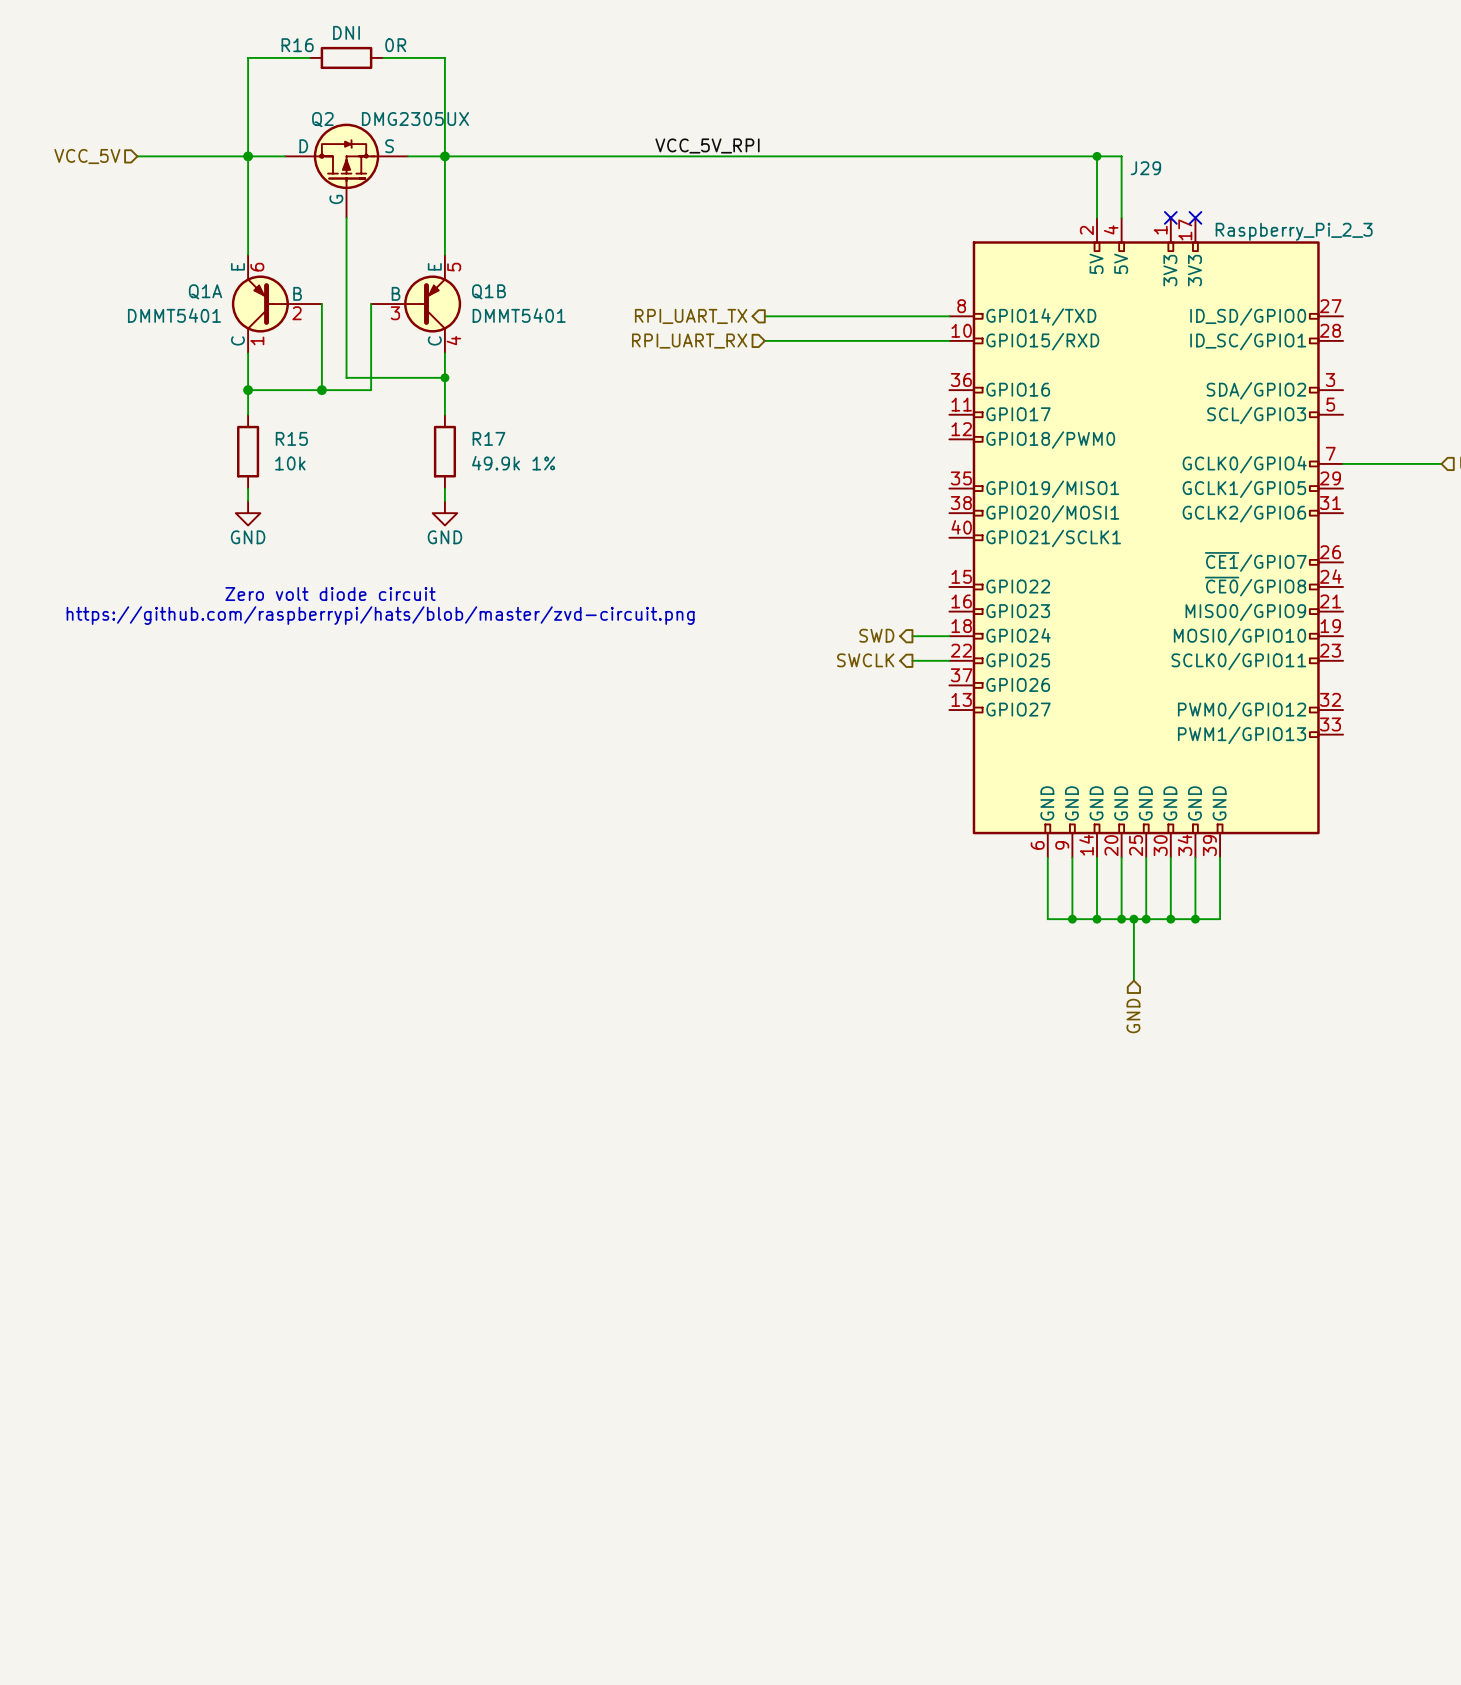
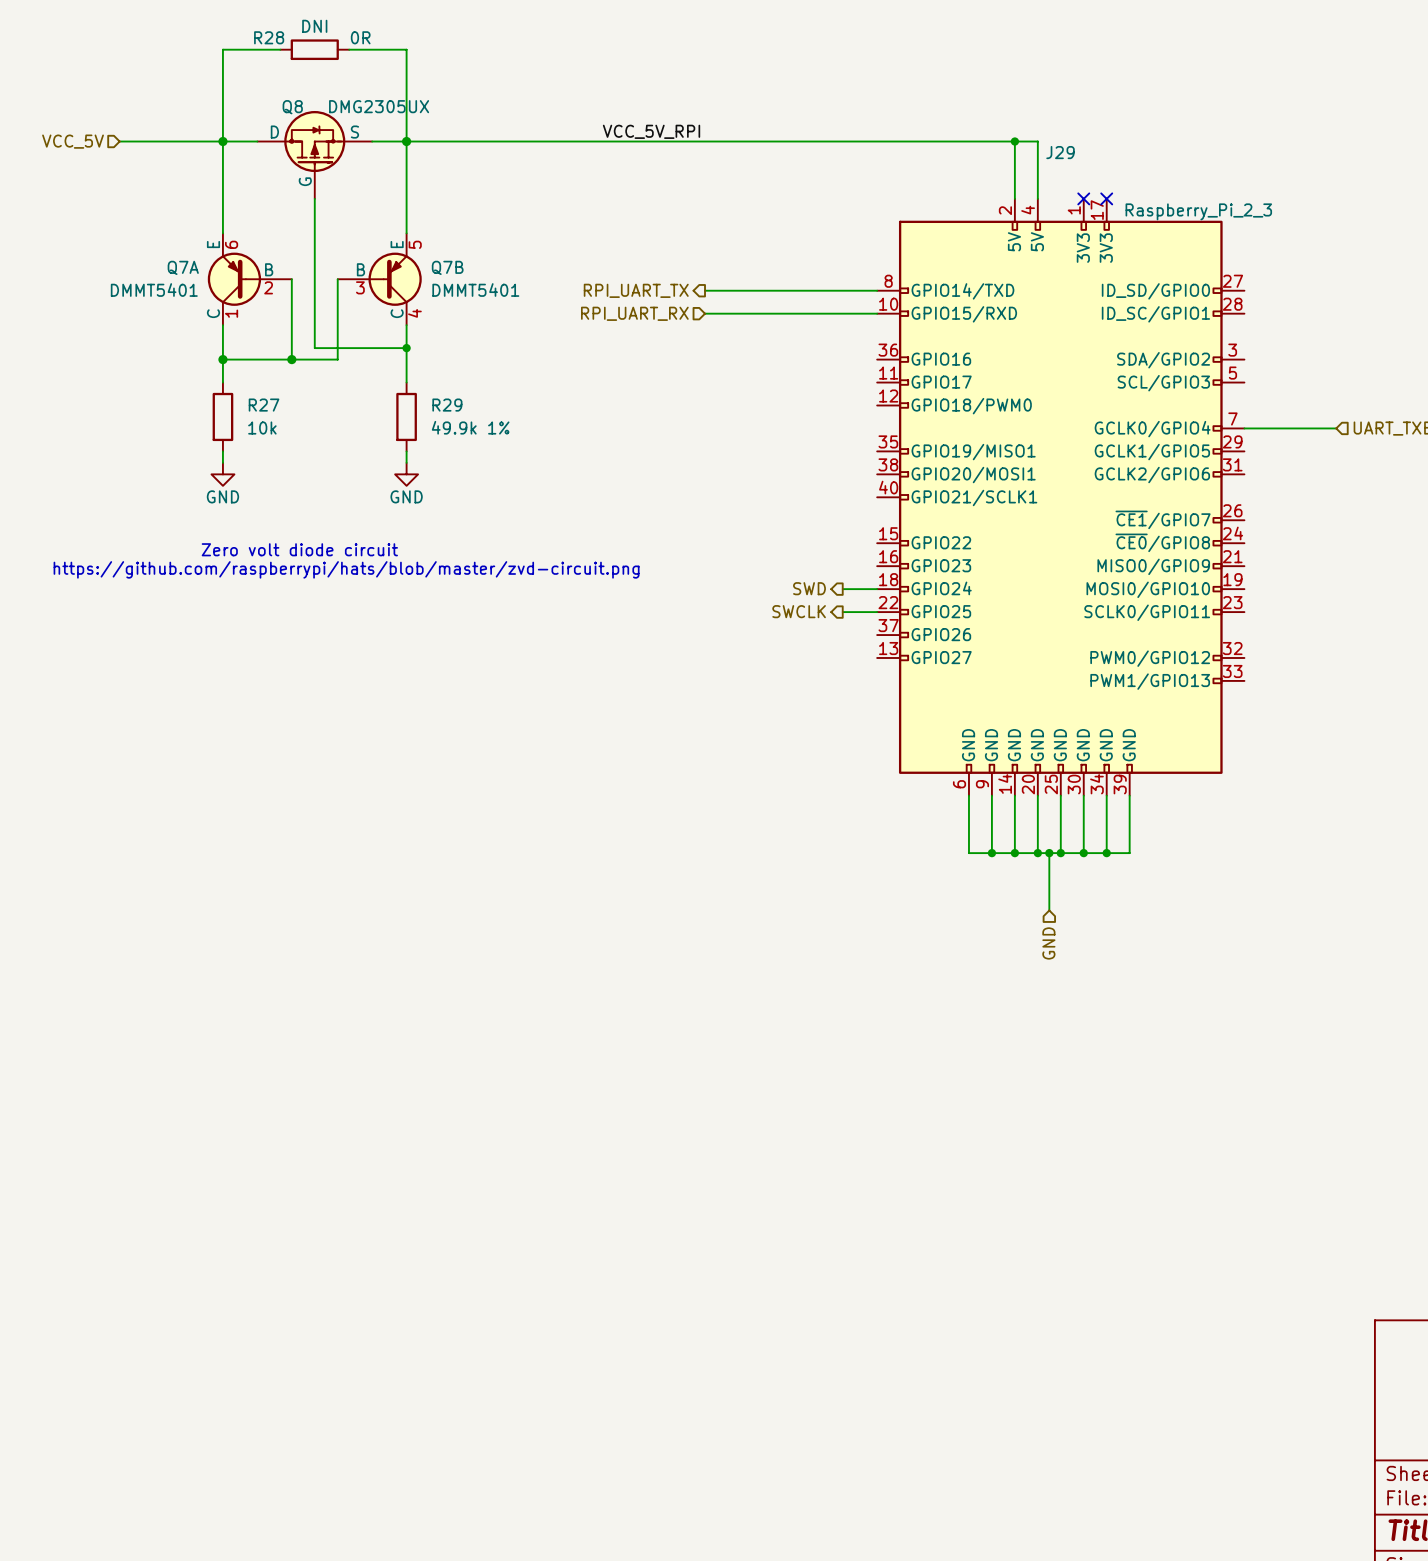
R16 name: R16 (297, 45) -> R28 (269, 37)
Q2 name: Q2 (322, 119) -> Q8 (292, 107)
Q1A name: Q1A (205, 291) -> Q7A (183, 267)
Q1B name: Q1B (488, 291) -> Q7B (447, 267)
R15 name: R15 (291, 438) -> R27 (264, 405)
R17 name: R17 (488, 438) -> R29 (447, 405)

